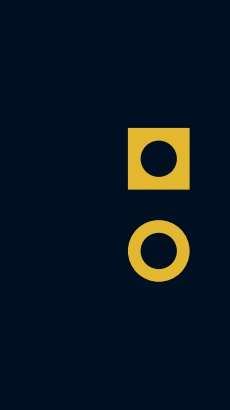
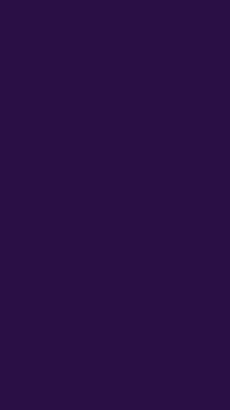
part: (158, 204) -> none

